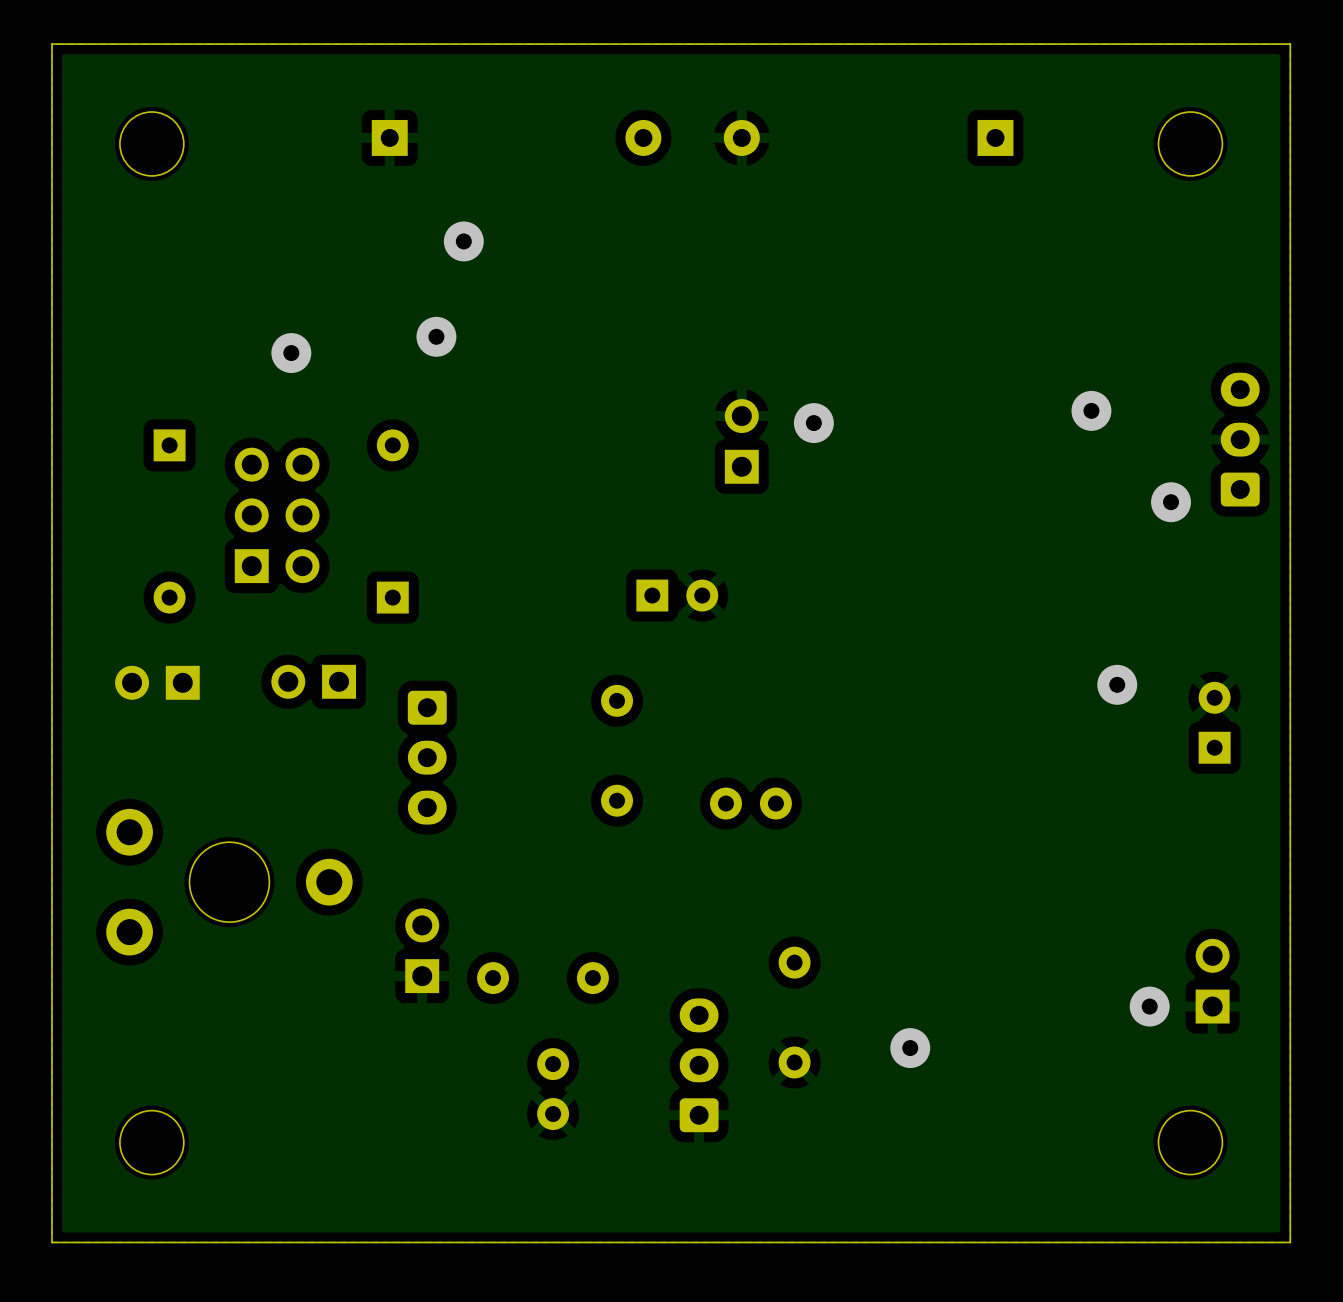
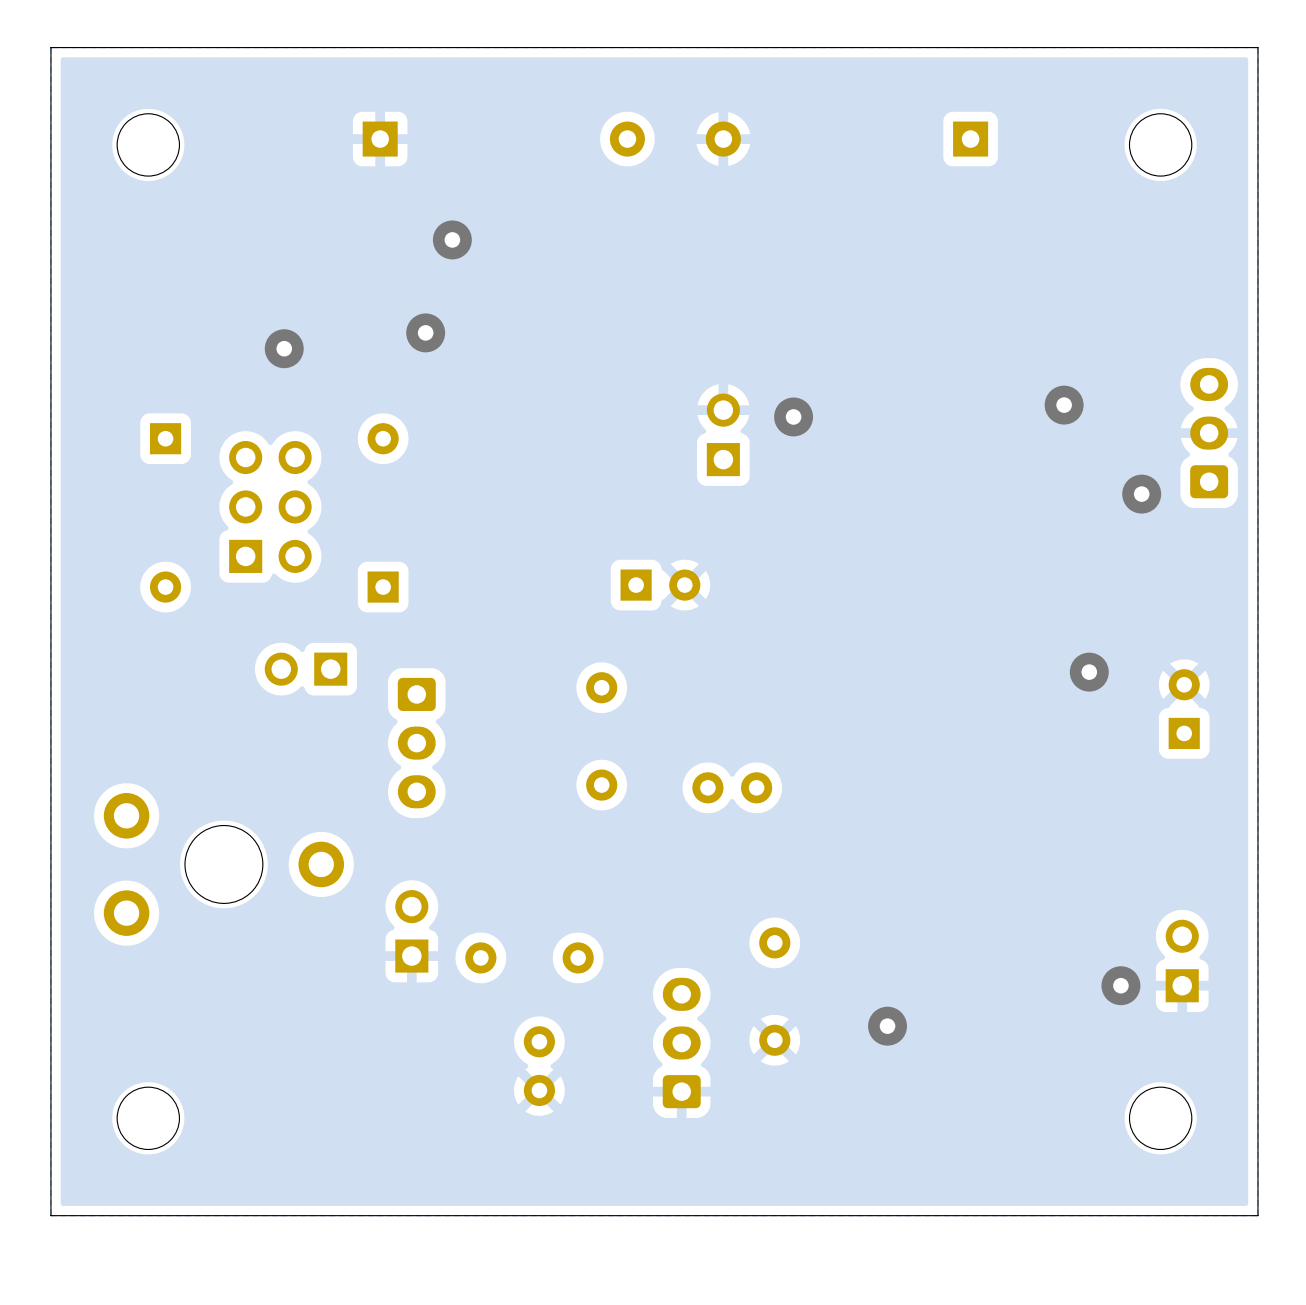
part: (157, 682) -> none

